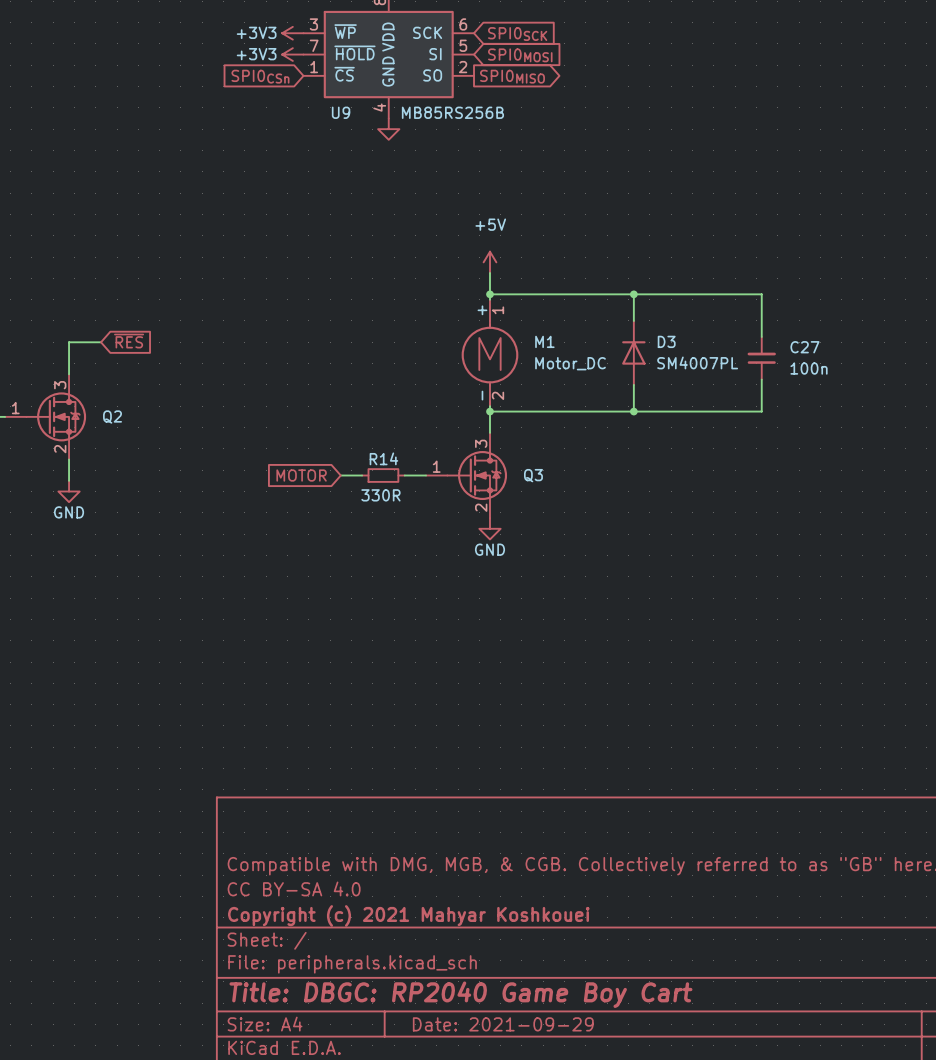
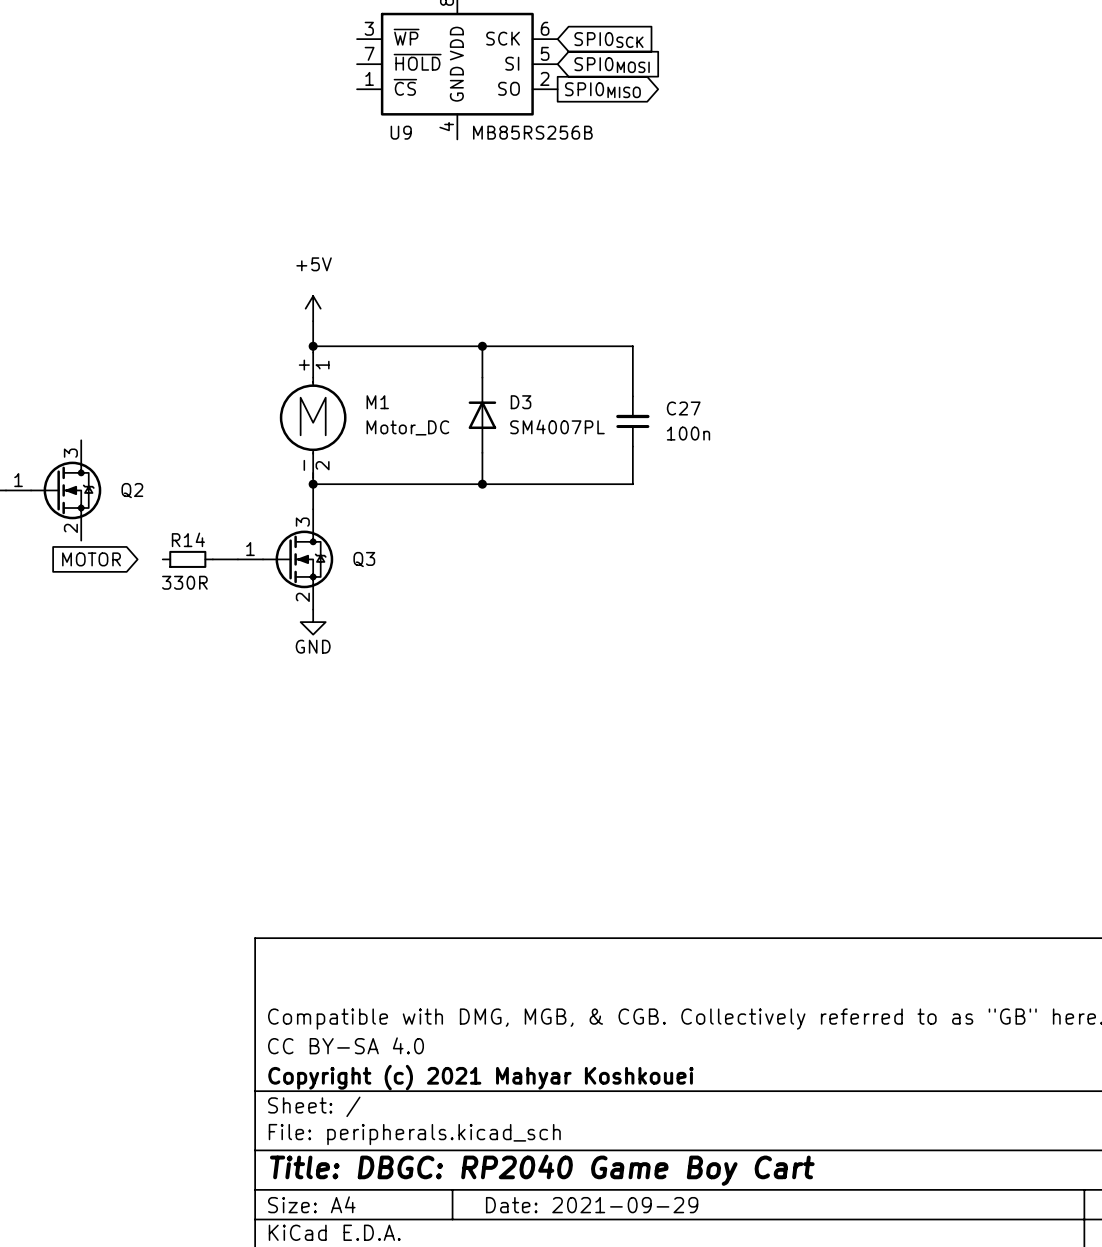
power symbol: +3V3 (292, 33) -> none
power symbol: +3V3 (292, 54) -> none
global label: SPI0CSn (260, 76) -> none
power symbol: (388, 129) -> none
power symbol: none -> +5V (313, 308)
power symbol: +5V (489, 262) -> none
wire: none -> (313, 321) (313, 352)
wire: (489, 273) (489, 299) -> (482, 346) (482, 377)
wire: none -> (313, 346) (576, 346)
junction: none -> (313, 346)
junction: none -> (482, 346)
junction: (489, 294) -> none
wire: (537, 294) (761, 294) (761, 336) -> (632, 346) (632, 396)
wire: (633, 294) (633, 320) -> none
junction: (633, 294) -> none
global label: ~{RES} (129, 341) -> none
wire: (101, 342) (69, 342) (69, 374) -> none
M1 position: (489, 352) -> (313, 415)
D3 position: (633, 352) -> (482, 415)
C27 position: (761, 358) -> (632, 421)
wire: (761, 379) (761, 411) (537, 411) -> (632, 446) (632, 484)
wire: (633, 384) (633, 411) -> none
wire: none -> (313, 477) (313, 509)
wire: (489, 406) (489, 432) -> (482, 452) (482, 484)
wire: none -> (313, 484) (576, 484)
junction: none -> (313, 484)
junction: none -> (482, 484)
junction: (489, 411) -> none
junction: (633, 411) -> none
wire: (69, 459) (69, 480) -> none
global label: none -> MOTOR (91, 559)
global label: MOTOR (301, 475) -> none
wire: (340, 475) (362, 475) -> (212, 559) (237, 559)
R14 position: (383, 475) -> (187, 559)
wire: (404, 475) (426, 475) -> none
Q3 position: (466, 475) -> (285, 559)
power symbol: GND (69, 491) -> none
power symbol: none -> GND (313, 622)
power symbol: GND (489, 528) -> none

